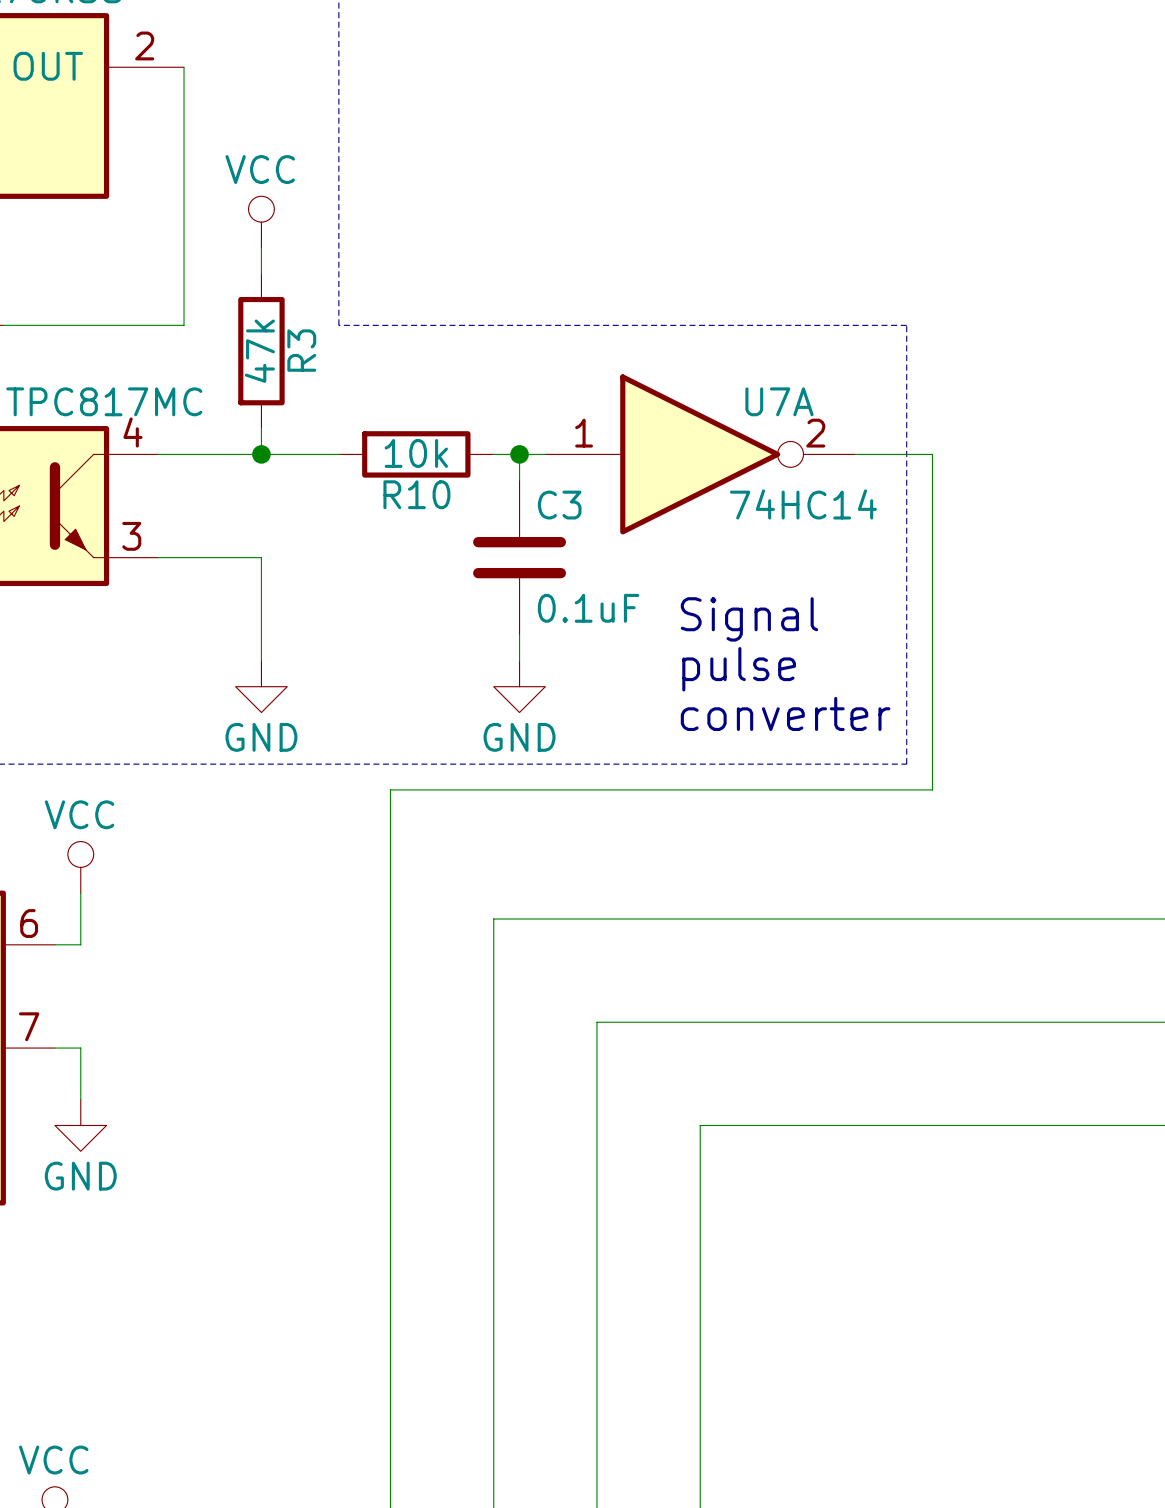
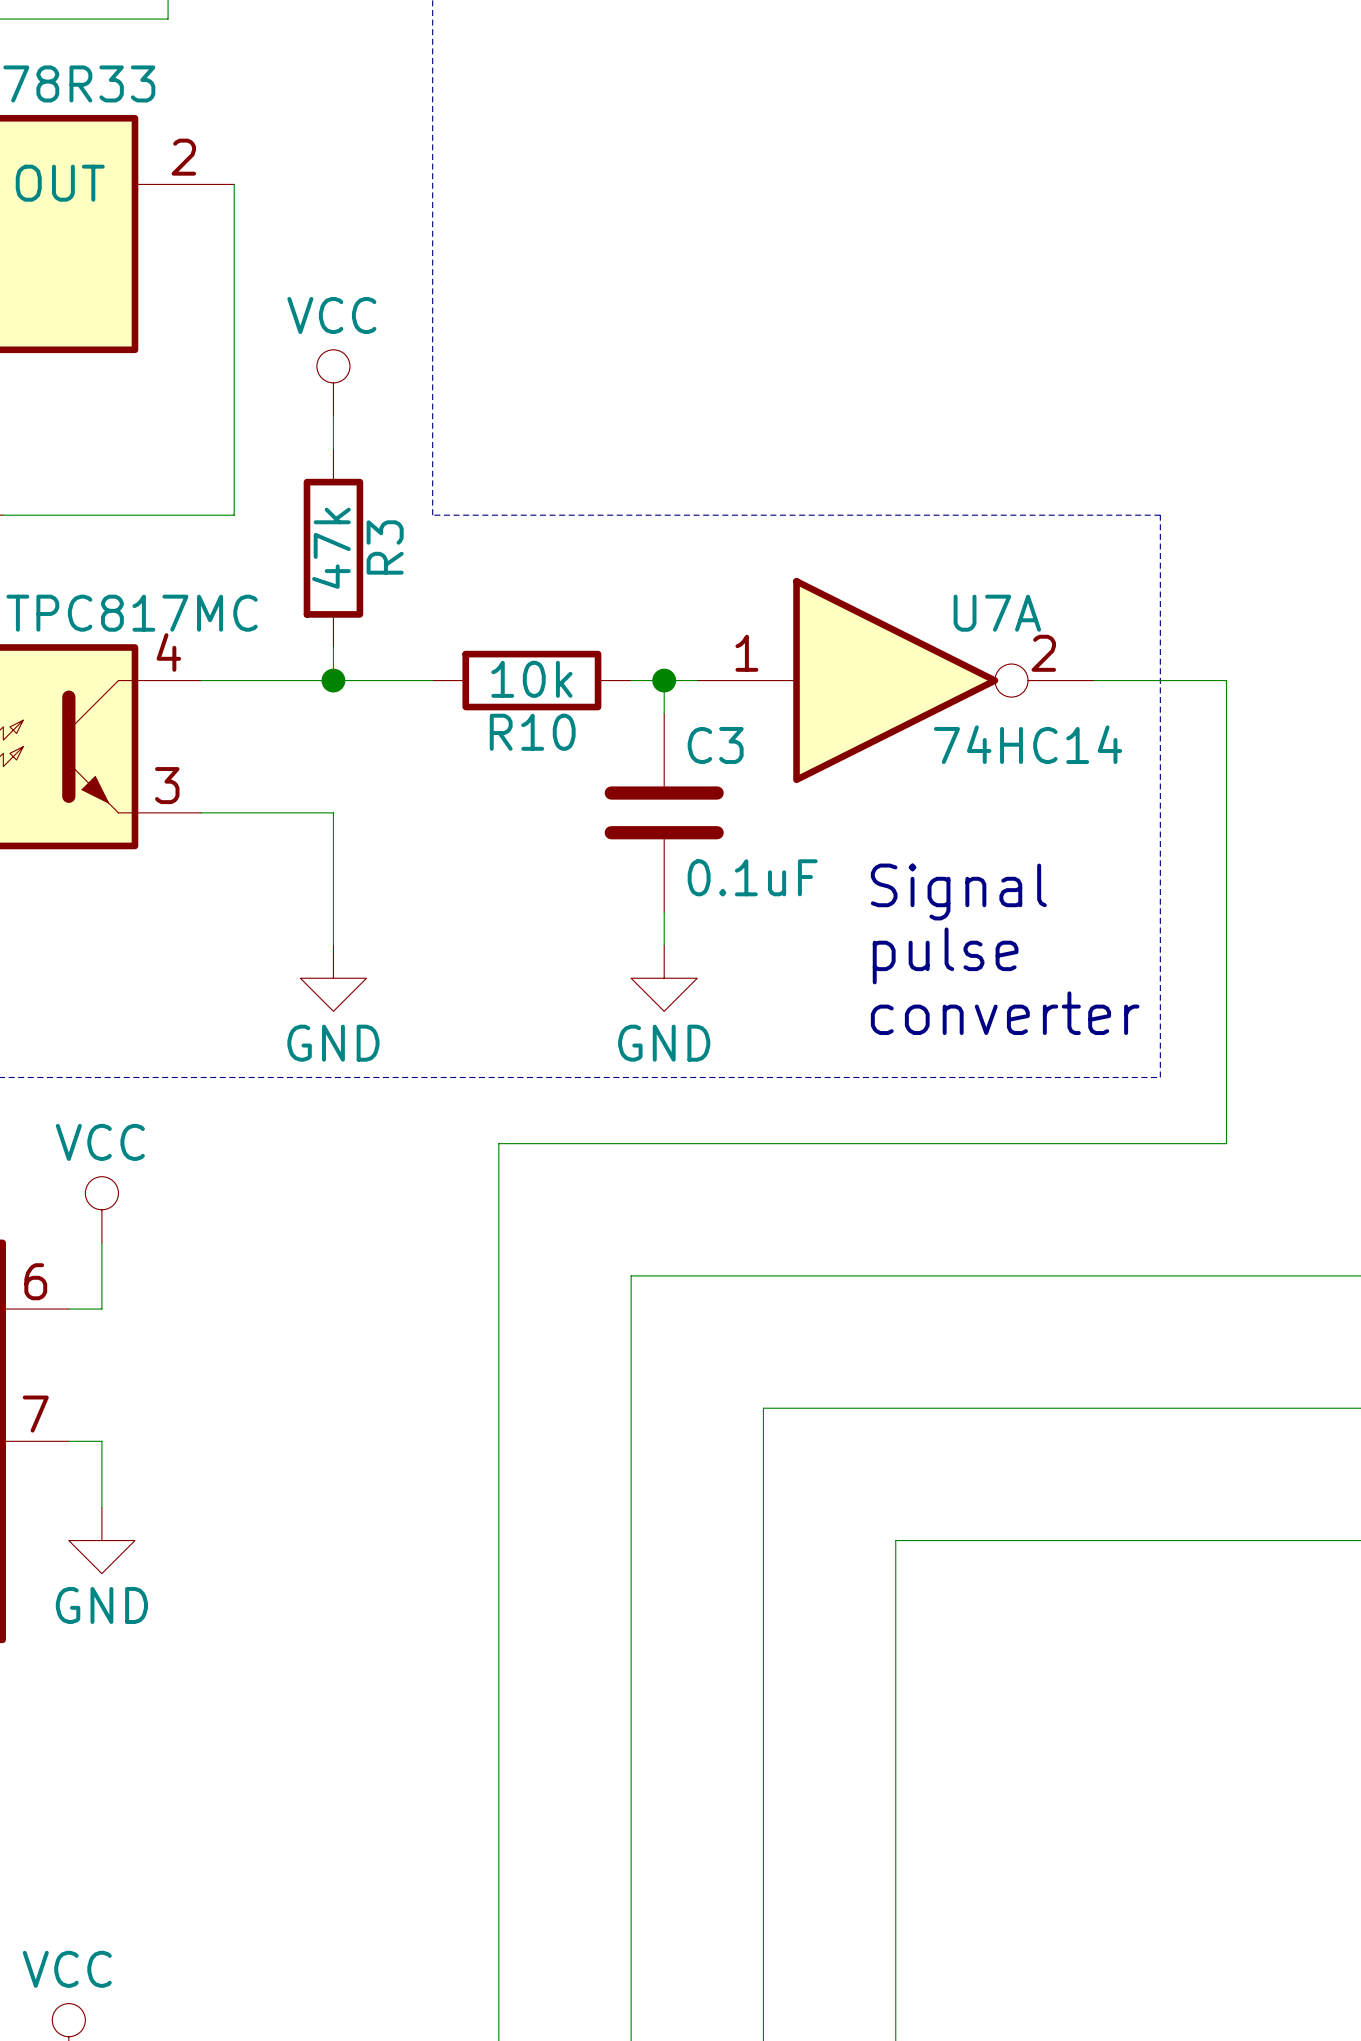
wire: (932, 454) (932, 789) (390, 789) (390, 815) -> (1193, 680) (1226, 680) (1226, 1143) (498, 1143)

